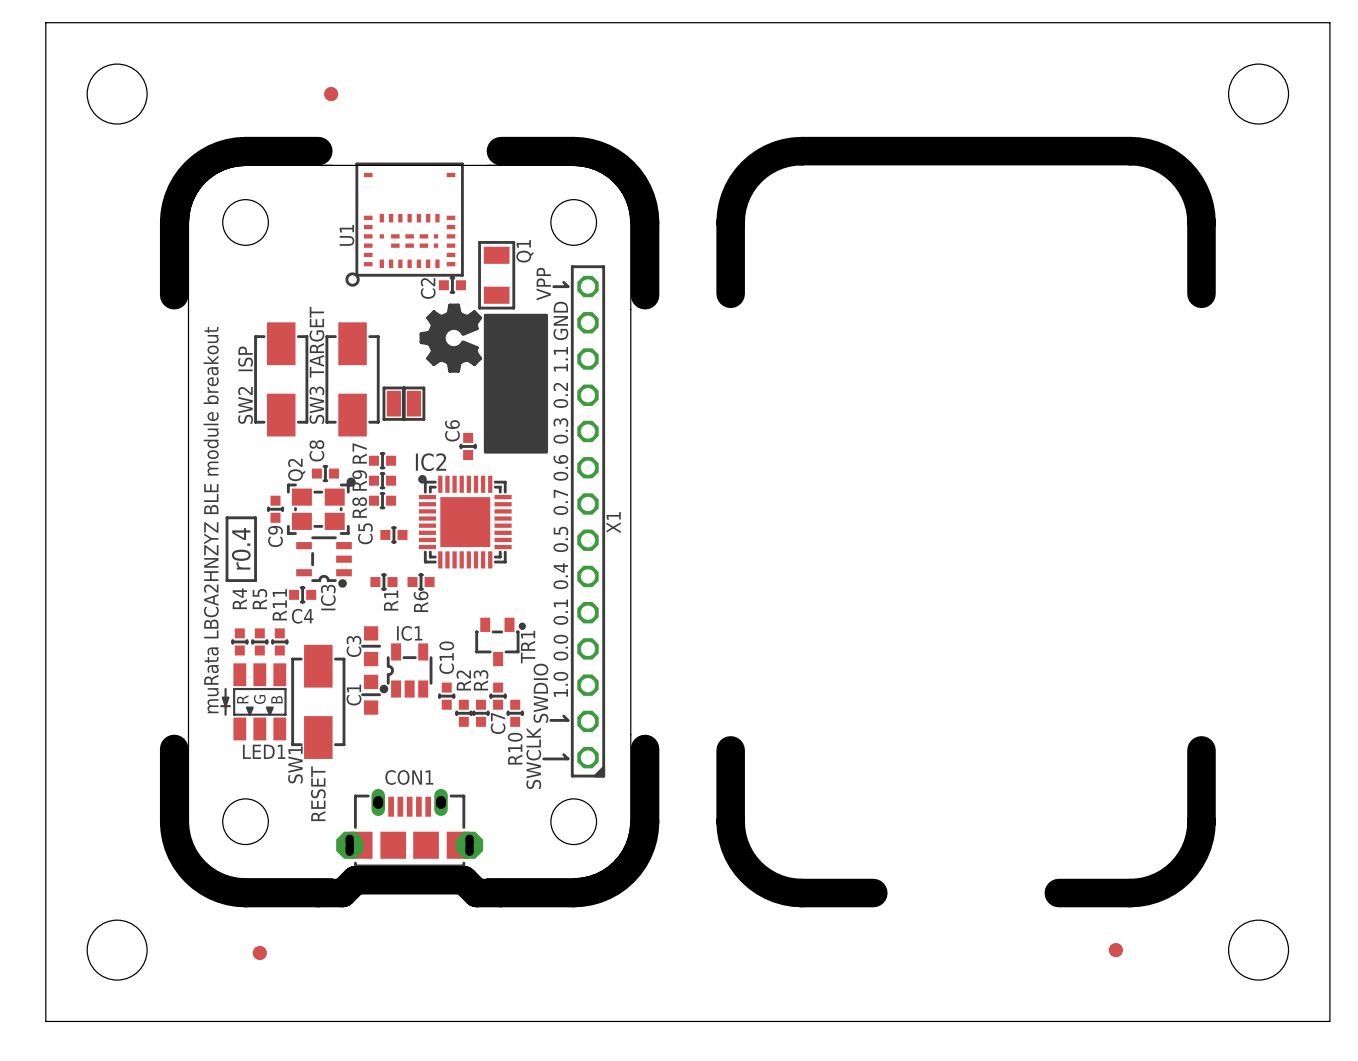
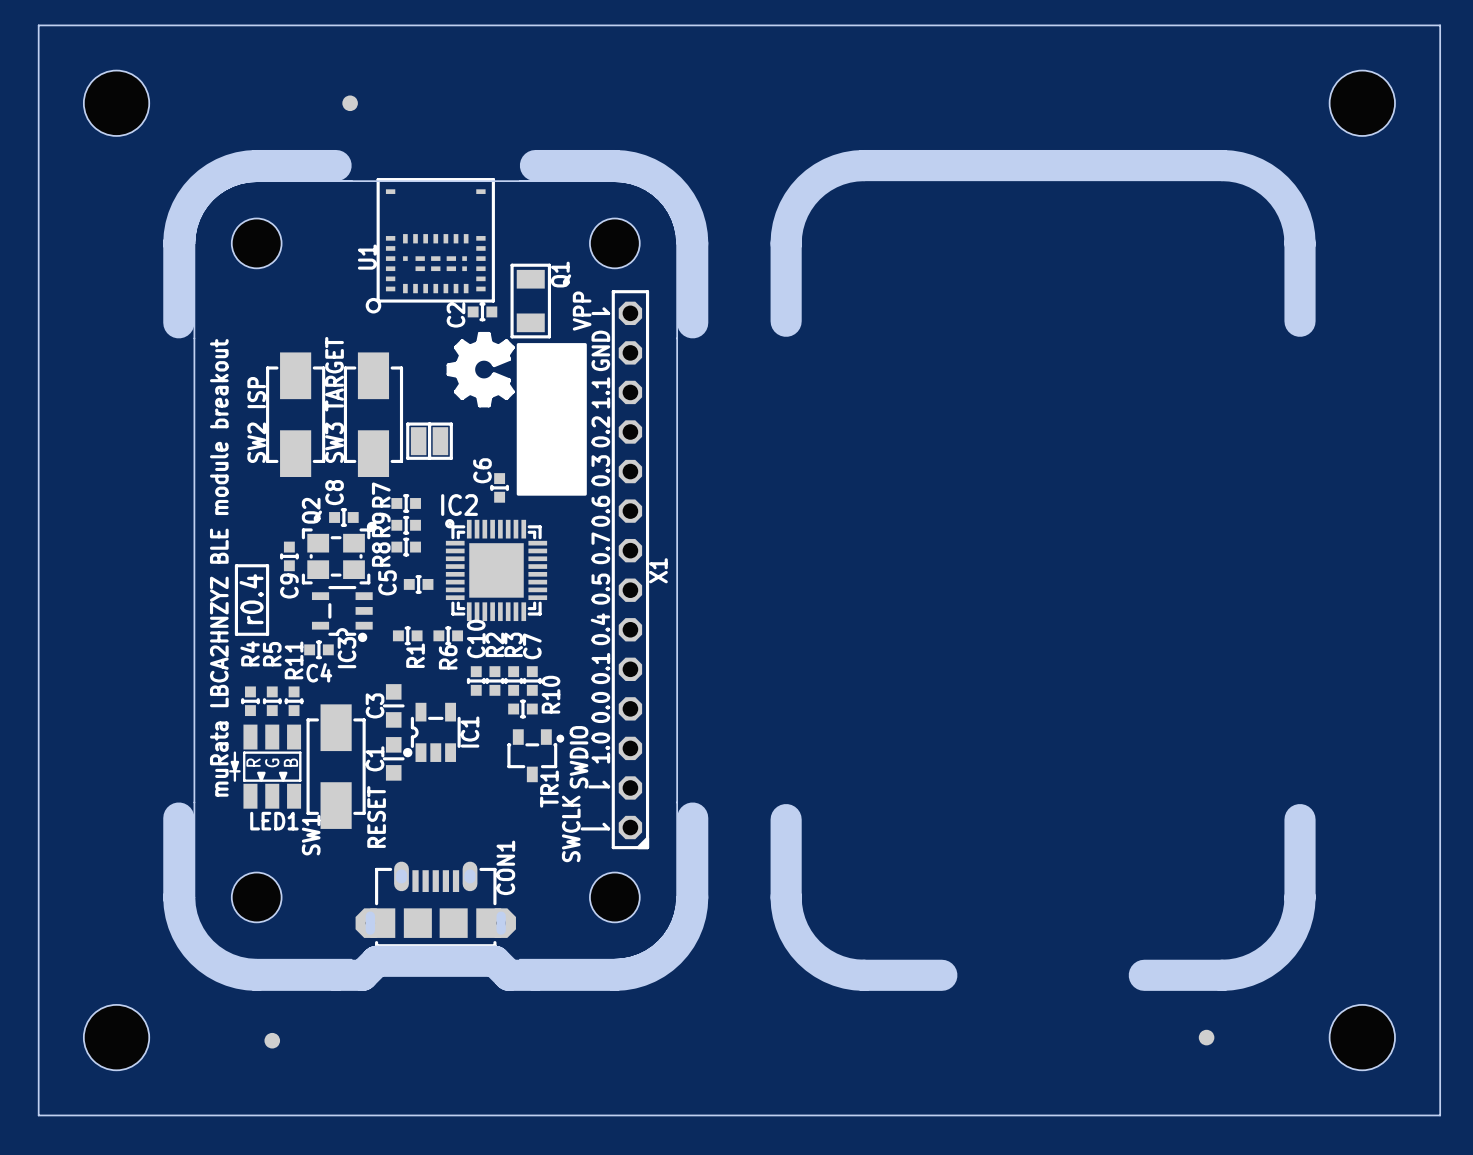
TR1 footprint: [475, 617, 526, 667] -> [507, 729, 565, 783]
IC1 name rotation: 0° (409, 633) -> 90° counterclockwise (470, 732)
IC1 name position: IC1 (409, 633) -> IC1 (470, 732)
TR1 name position: TR1 (528, 647) -> TR1 (549, 789)
C10 position: (446, 696) -> (476, 680)
C7 position: (498, 696) -> (532, 680)
R2 position: (463, 713) -> (494, 680)
R3 position: (480, 713) -> (513, 680)
R10 rotation: 0° (515, 713) -> 90° clockwise (522, 709)
R10 position: (515, 713) -> (522, 709)
C7 name position: C7 (498, 723) -> C7 (532, 646)
R10 name position: R10 (515, 748) -> R10 (551, 694)
CON1 name rotation: 0° (409, 777) -> 90° counterclockwise (505, 867)
CON1 name position: CON1 (409, 777) -> CON1 (505, 867)
text position: RESET (318, 793) -> RESET (376, 817)

